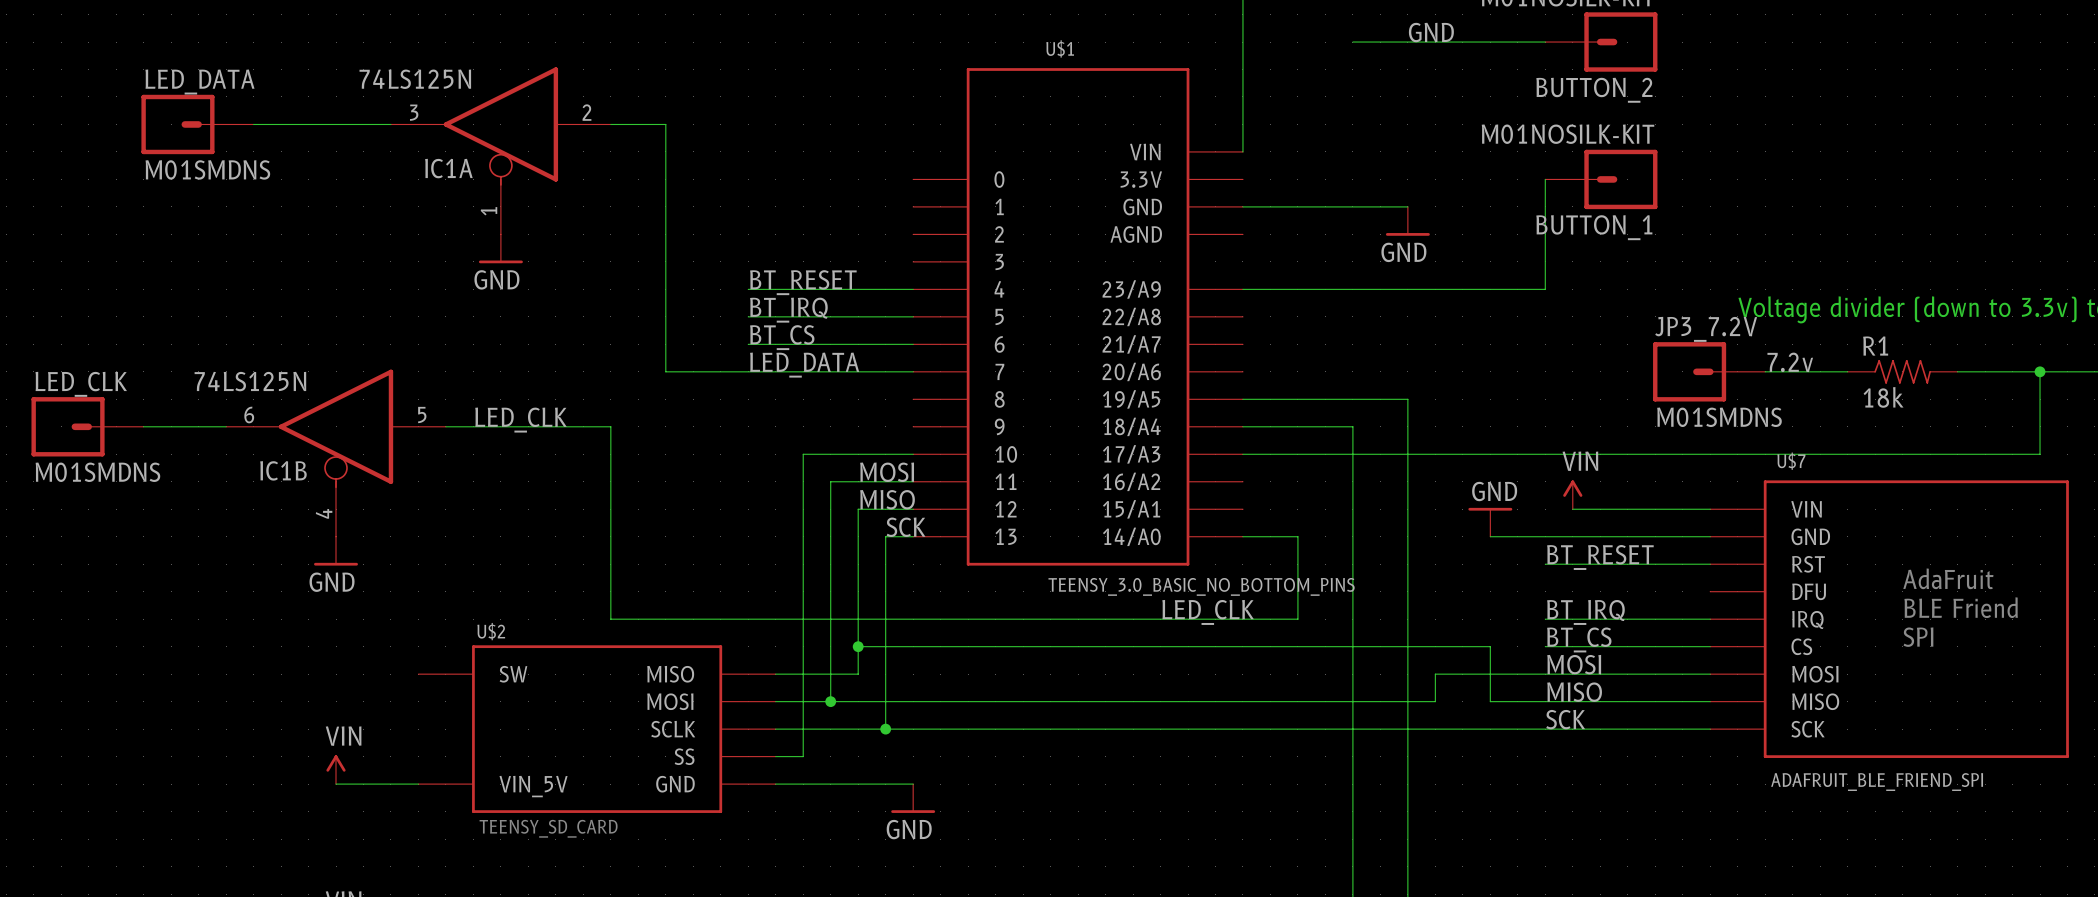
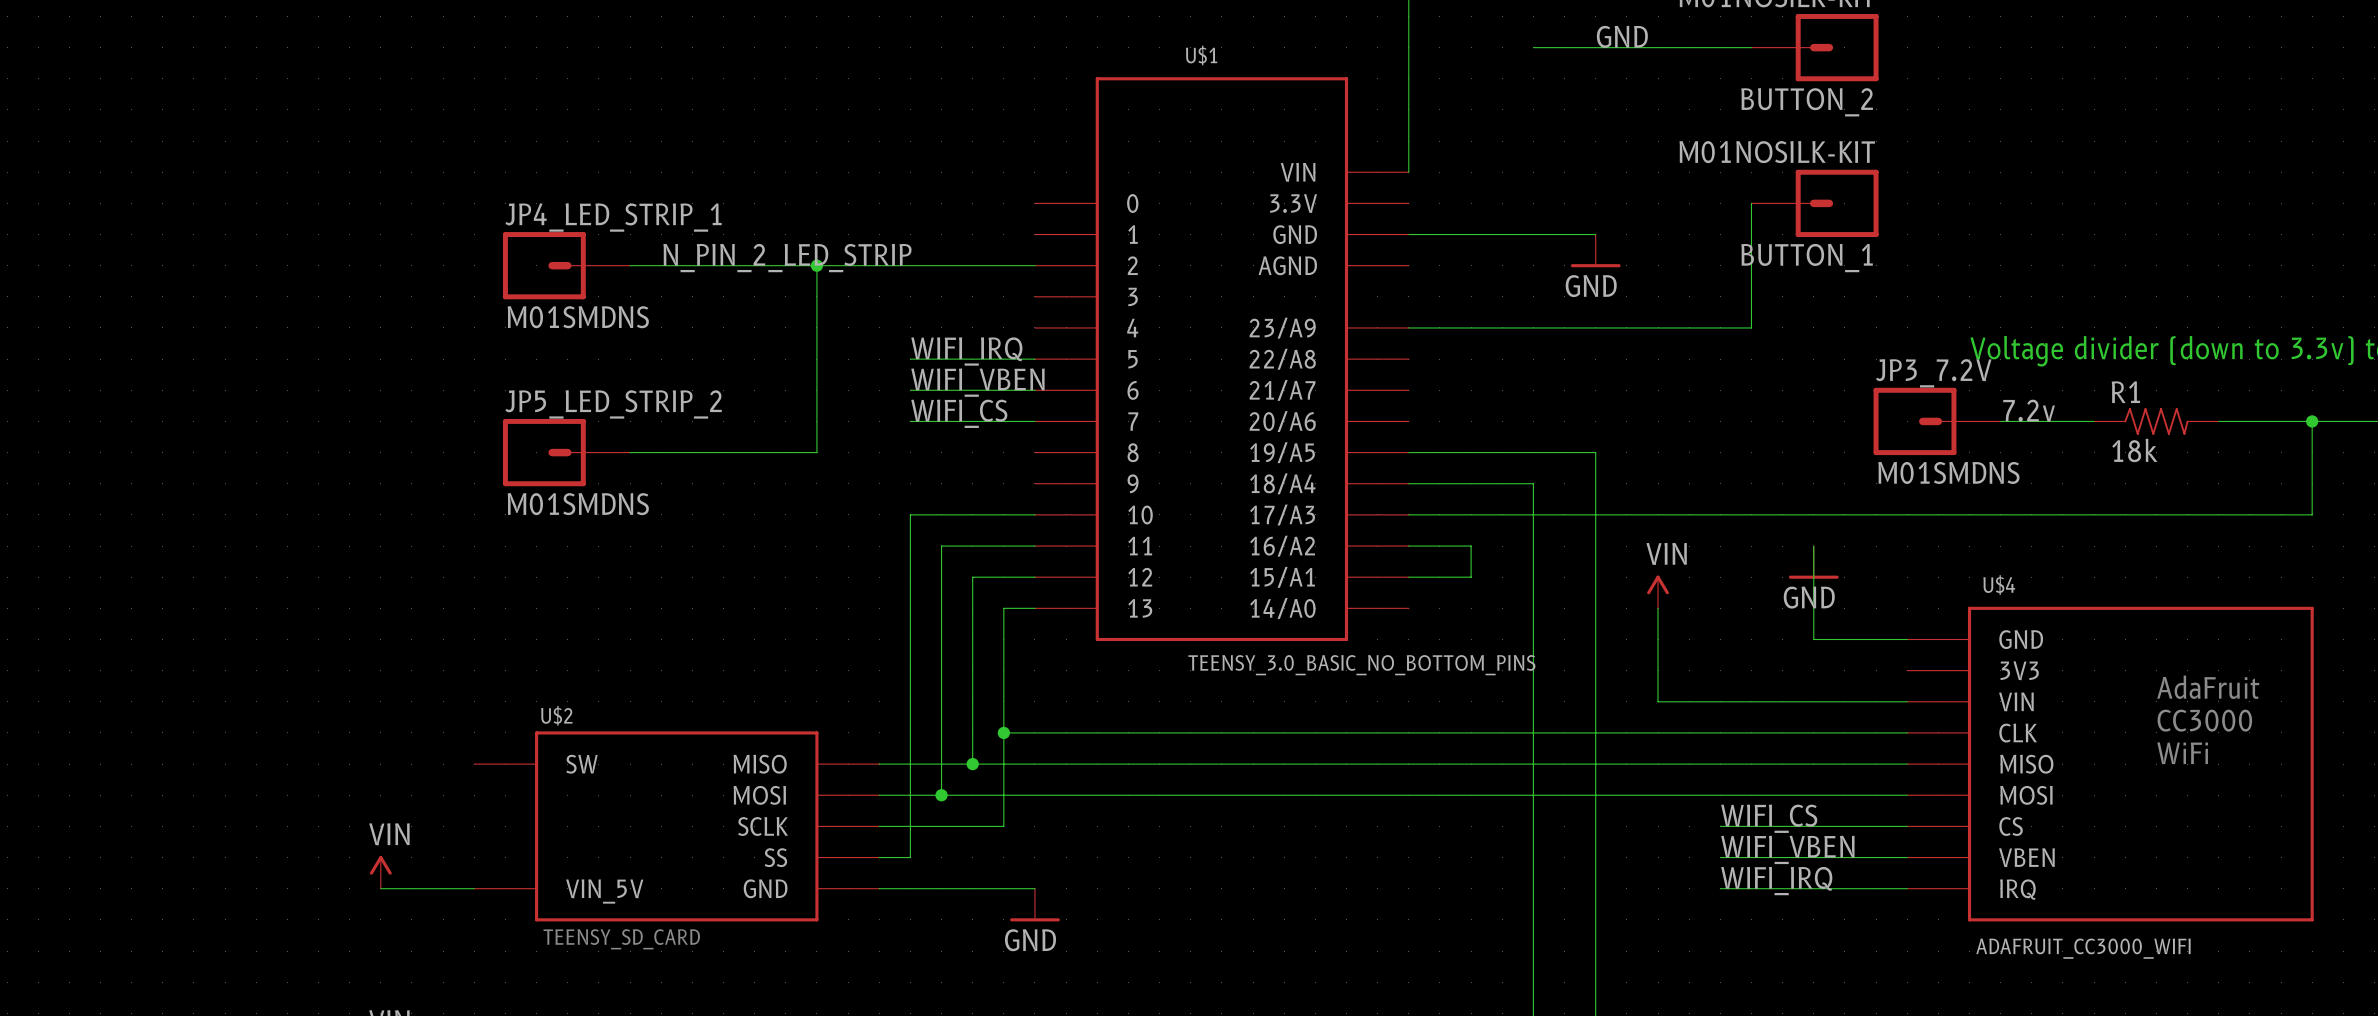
LED_DATA: M01SMDNS (197, 124) -> none
wire: (253, 124) (390, 124) -> none
wire: (610, 124) (665, 124) (665, 371) (803, 371) -> none
IC1A: 74LS125N (500, 150) -> none
label: none -> N_PIN_2_LED_STRIP (787, 258)
JP4_LED_STRIP_1: none -> M01SMDNS (566, 265)
wire: none -> (630, 265) (1034, 265)
wire: none -> (816, 265) (816, 452) (630, 452)
junction: none -> (816, 265)
power symbol: GND (500, 248) -> none
label: BT_RESET (803, 282) -> none
wire: (748, 289) (913, 289) -> none
label: BT_IRQ (788, 310) -> none
label: none -> WIFI_IRQ (966, 351)
wire: (748, 316) (803, 316) -> none
label: BT_CS (782, 337) -> none
label: none -> WIFI_VBEN (977, 382)
wire: (748, 344) (803, 344) -> none
label: LED_DATA (804, 365) -> none
label: none -> WIFI_CS (959, 413)
JP5_LED_STRIP_2: none -> M01SMDNS (566, 452)
label: LED_CLK (520, 420) -> none
LED_CLK: M01SMDNS (87, 426) -> none
wire: (143, 426) (226, 426) -> none
wire: (445, 426) (610, 426) (610, 619) (1297, 619) (1297, 536) (1242, 536) -> none
IC1B: 74LS125N (336, 453) -> none
label: MOSI (887, 472) -> none
wire: none -> (1408, 546) (1471, 546) (1471, 577) (1408, 577)
power symbol position: VIN (1572, 494) -> VIN (1658, 591)
label: MISO (887, 499) -> none
power symbol rotation: 0° (1490, 509) -> 180° (1813, 577)
wire: (1572, 509) (1710, 509) -> none
power symbol position: GND (1490, 522) -> GND (1813, 562)
label: SCK (906, 527) -> none
wire: none -> (1658, 608) (1658, 701) (1751, 701)
wire: (1490, 536) (1710, 536) -> none
power symbol: GND (336, 551) -> none
label: BT_RESET (1600, 557) -> none
wire: (1545, 564) (1600, 564) -> (1813, 546) (1813, 639)
label: LED_CLK (1208, 612) -> none
label: BT_IRQ (1585, 612) -> none
U$7: ADAFRUIT_BLE_FRIEND_SPI (1889, 619) -> none
label: BT_CS (1579, 639) -> none
wire: (858, 646) (885, 646) -> none
junction: (858, 646) -> none
junction: none -> (1003, 732)
wire: (1490, 646) (1490, 701) -> (1689, 732) (1751, 732)
label: MOSI (1574, 664) -> none
wire: none -> (972, 764) (1626, 764)
junction: none -> (972, 764)
wire: (1435, 674) (1435, 701) -> (1689, 795) (1626, 795)
U$4: none -> ADAFRUIT_CC3000_WIFI (2110, 764)
label: MISO (1574, 692) -> none
label: SCK (1565, 719) -> none
label: none -> WIFI_CS (1769, 818)
wire: (885, 729) (1517, 729) -> none
junction: (885, 729) -> none
label: none -> WIFI_VBEN (1787, 849)
wire: none -> (1720, 857) (1907, 857)
label: none -> WIFI_IRQ (1776, 881)
wire: none -> (1720, 888) (1907, 888)

